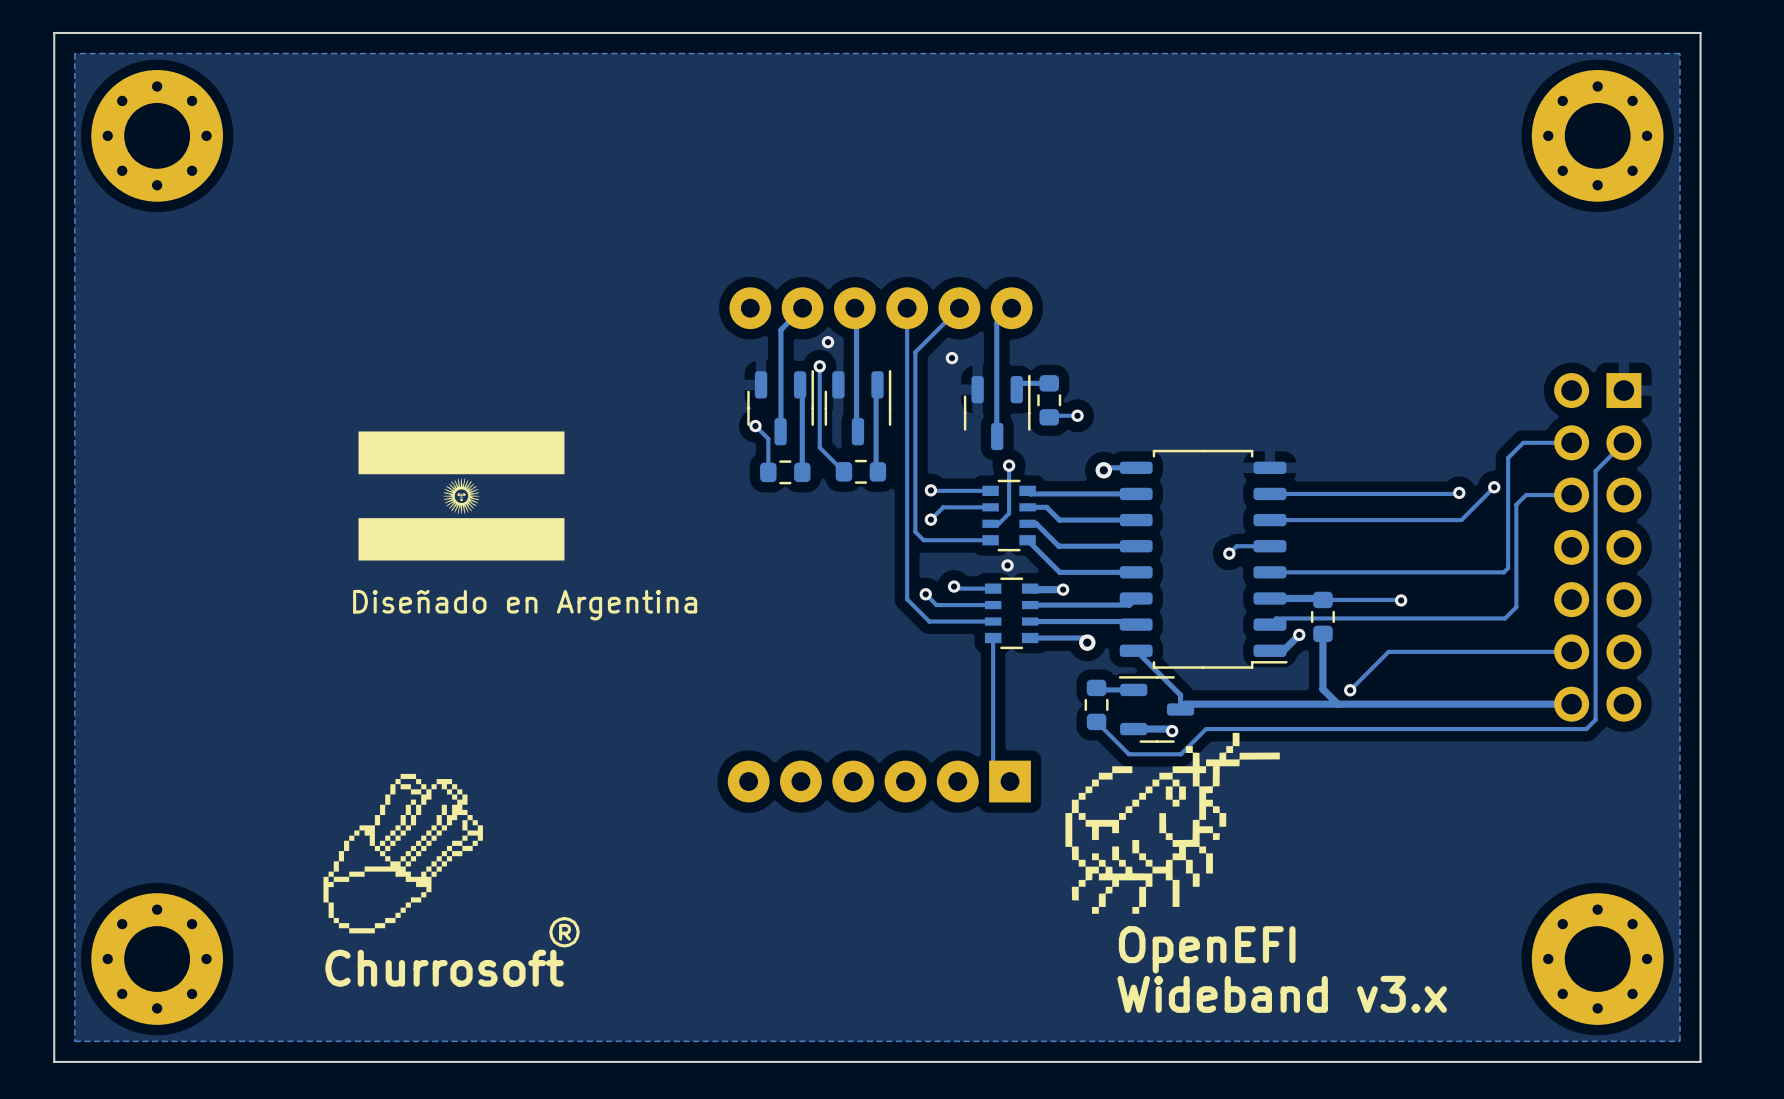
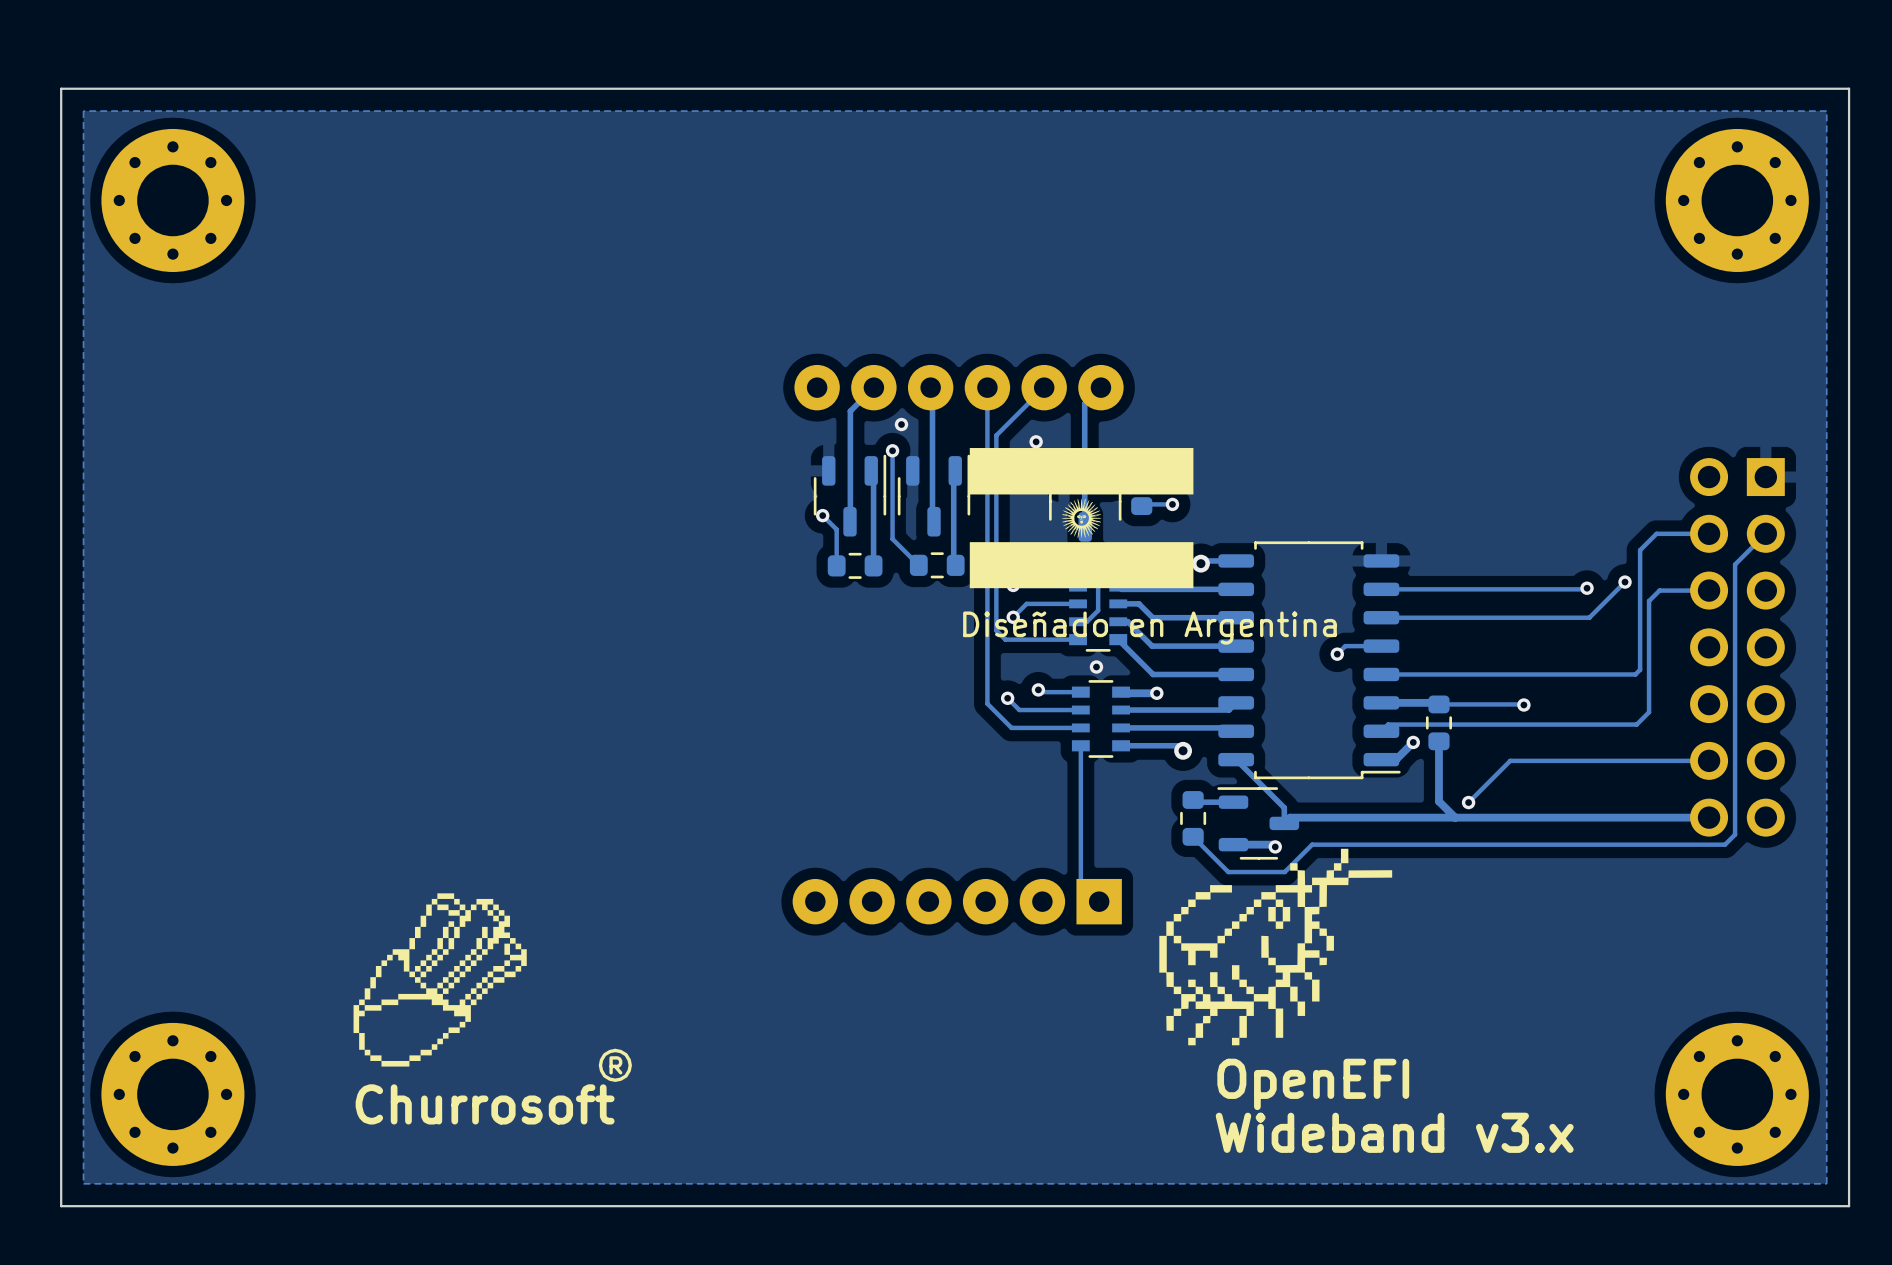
drawing: none -> [969, 448, 1194, 589]
drawing: [358, 431, 565, 561] -> none
text: none -> Diseñado en Argentina (1149, 628)
text: Diseñado en Argentina (525, 605) -> none

